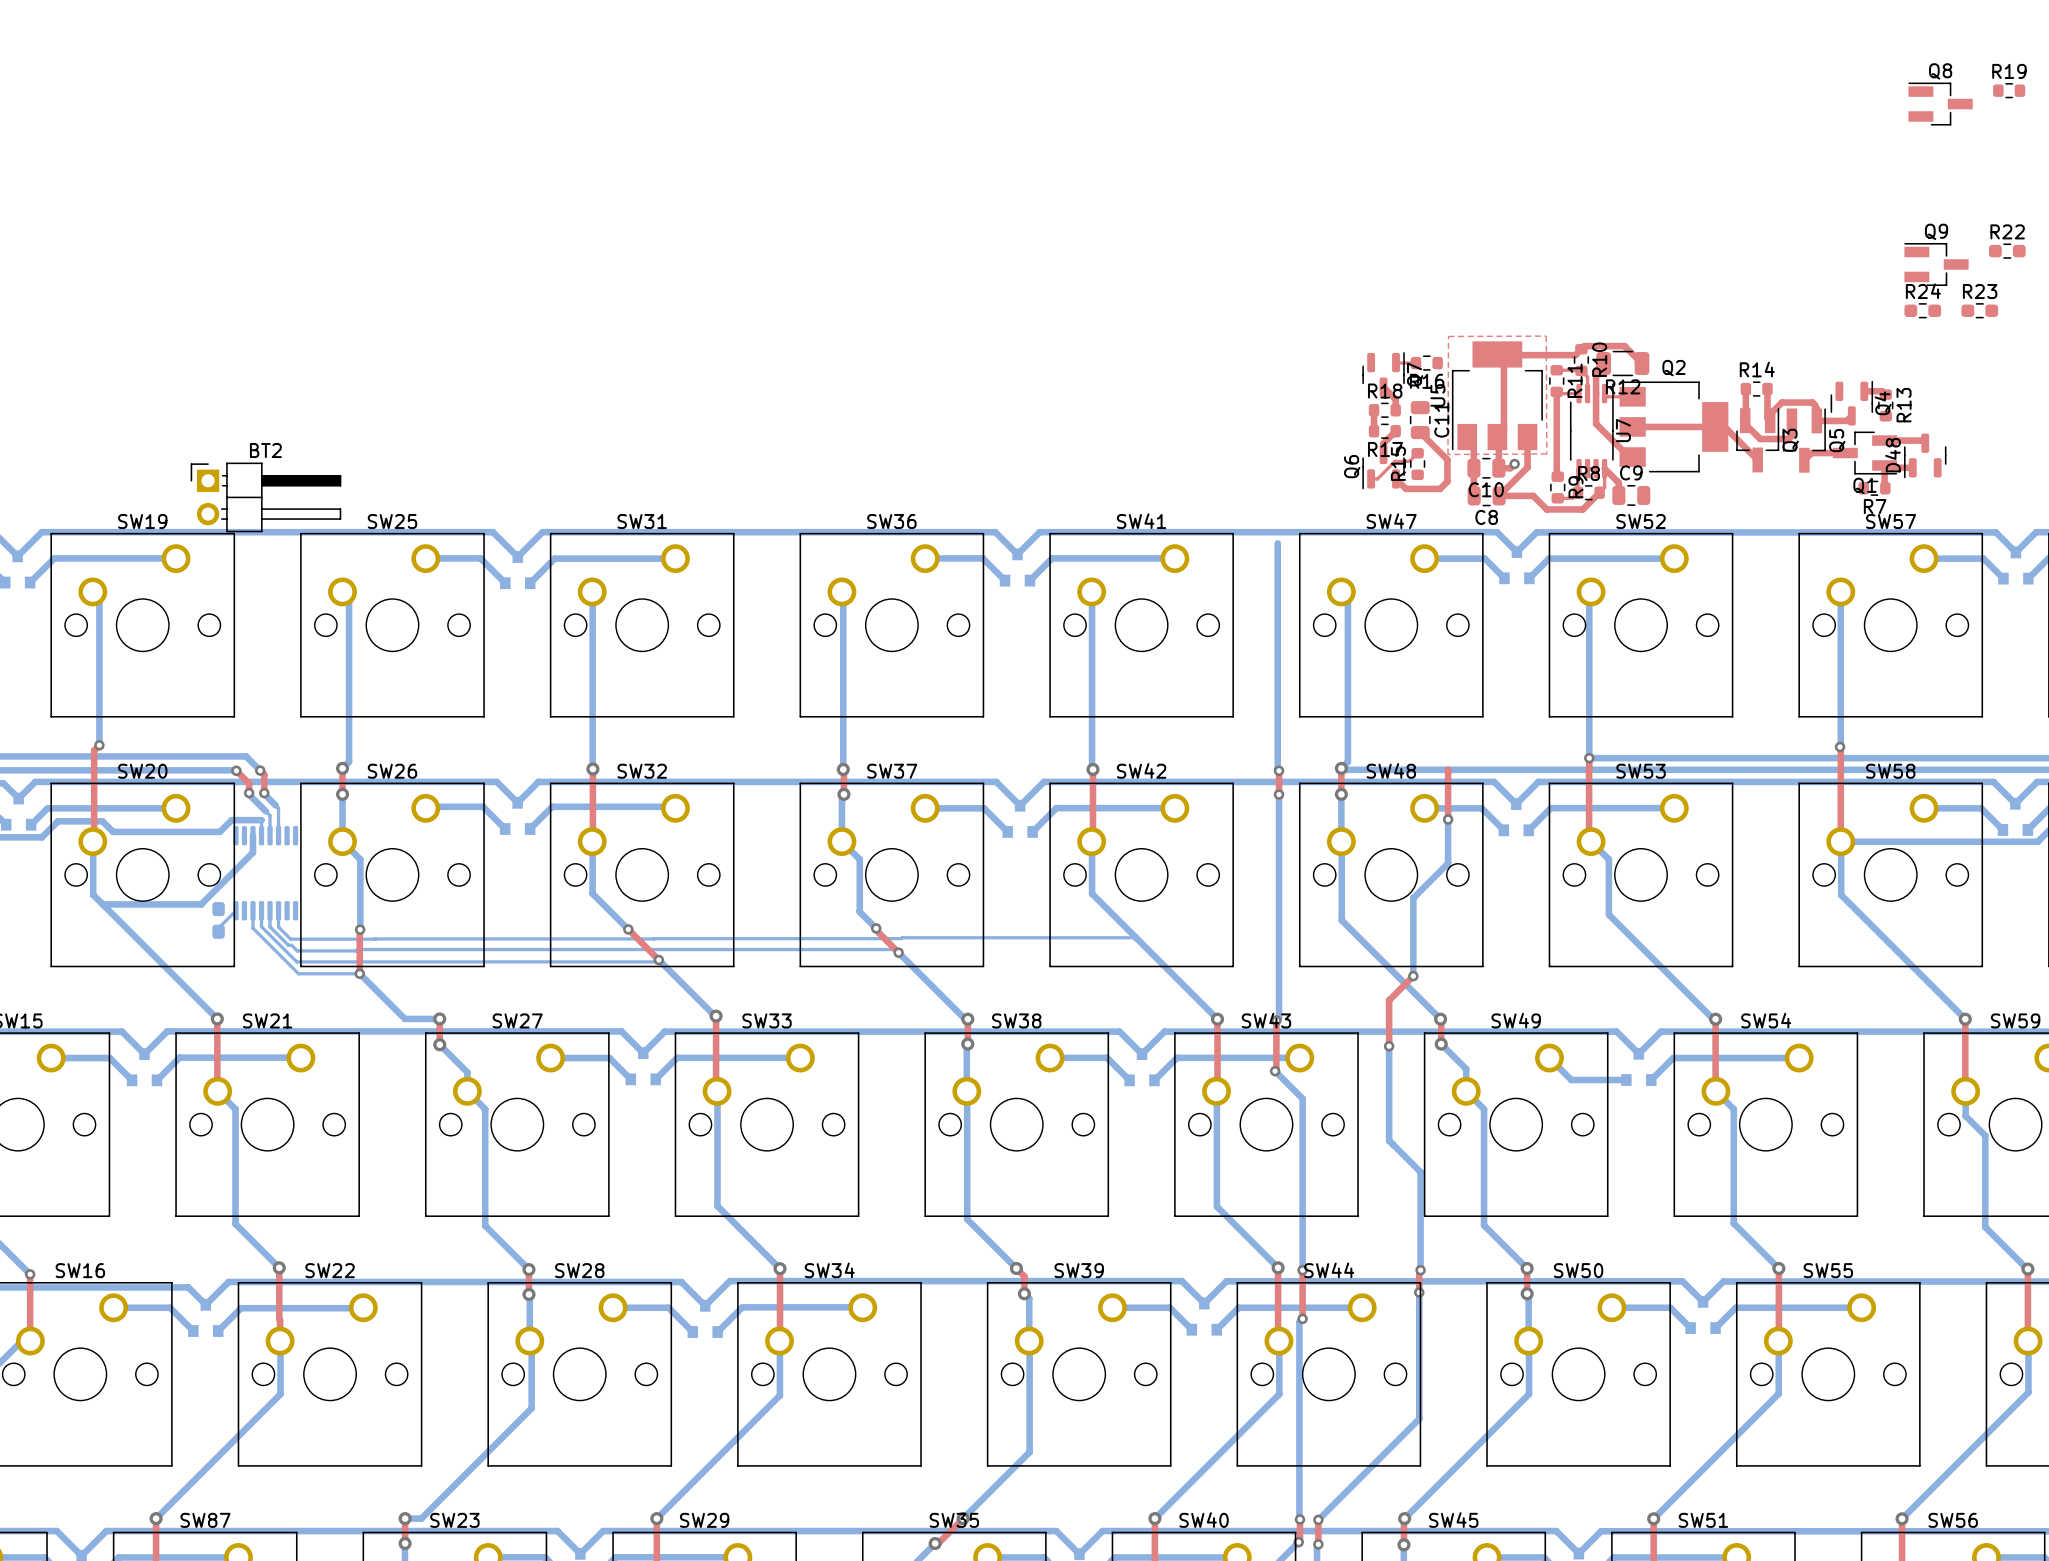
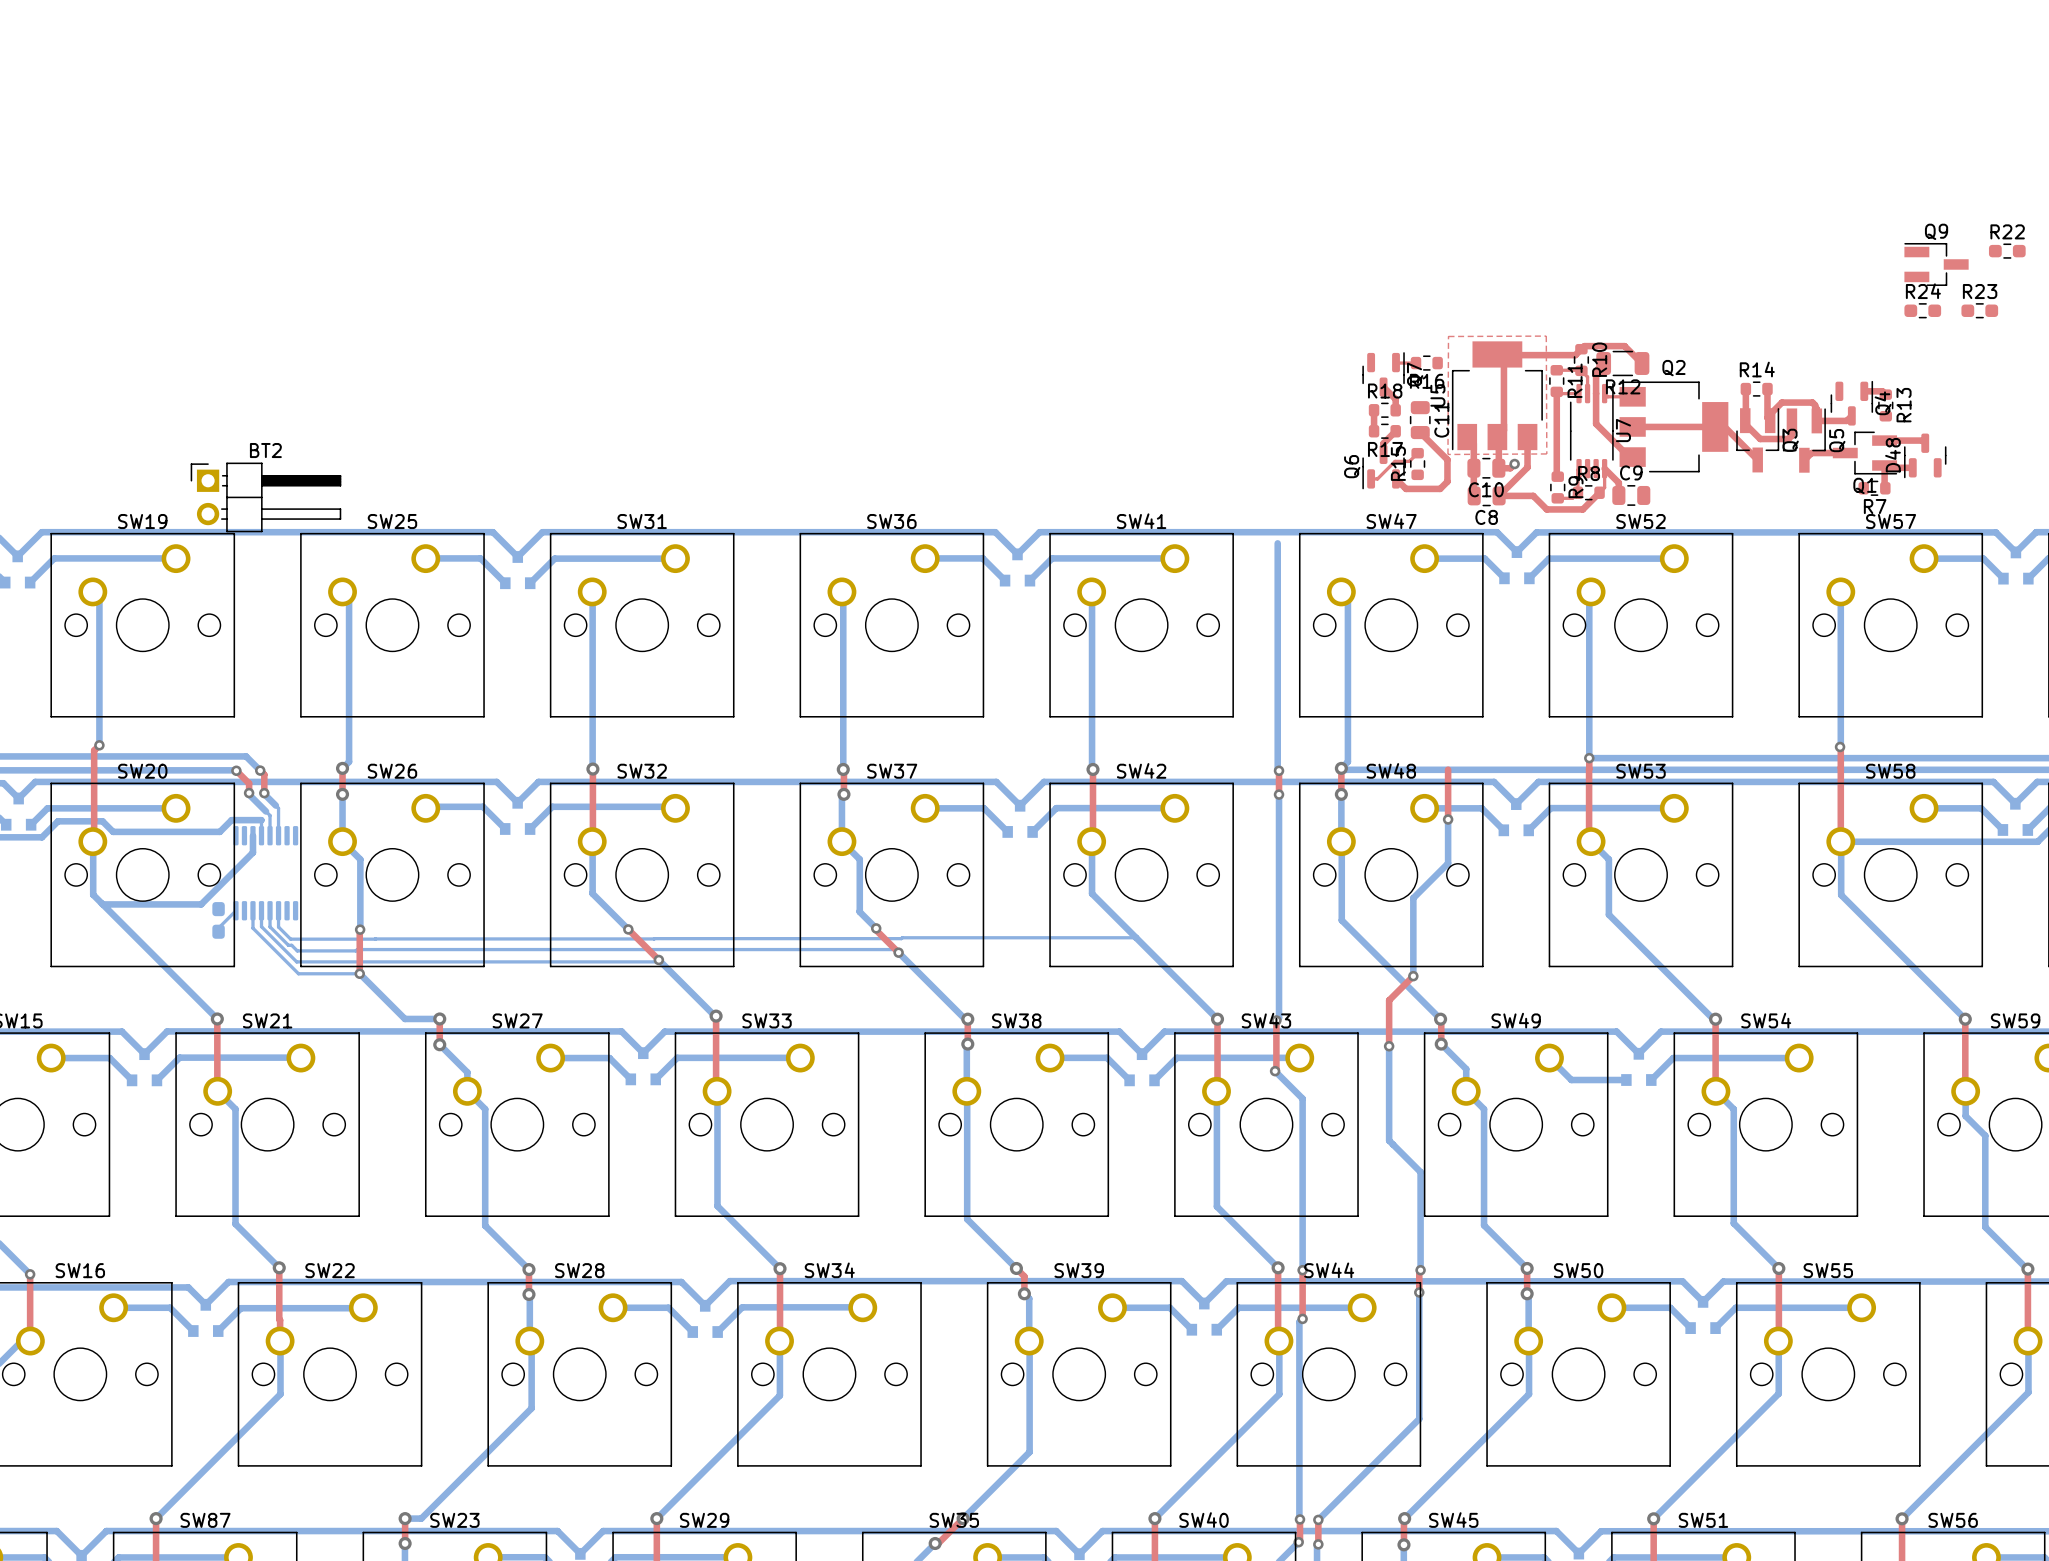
R19: (2009, 90) -> none
Q8: (1940, 104) -> none

